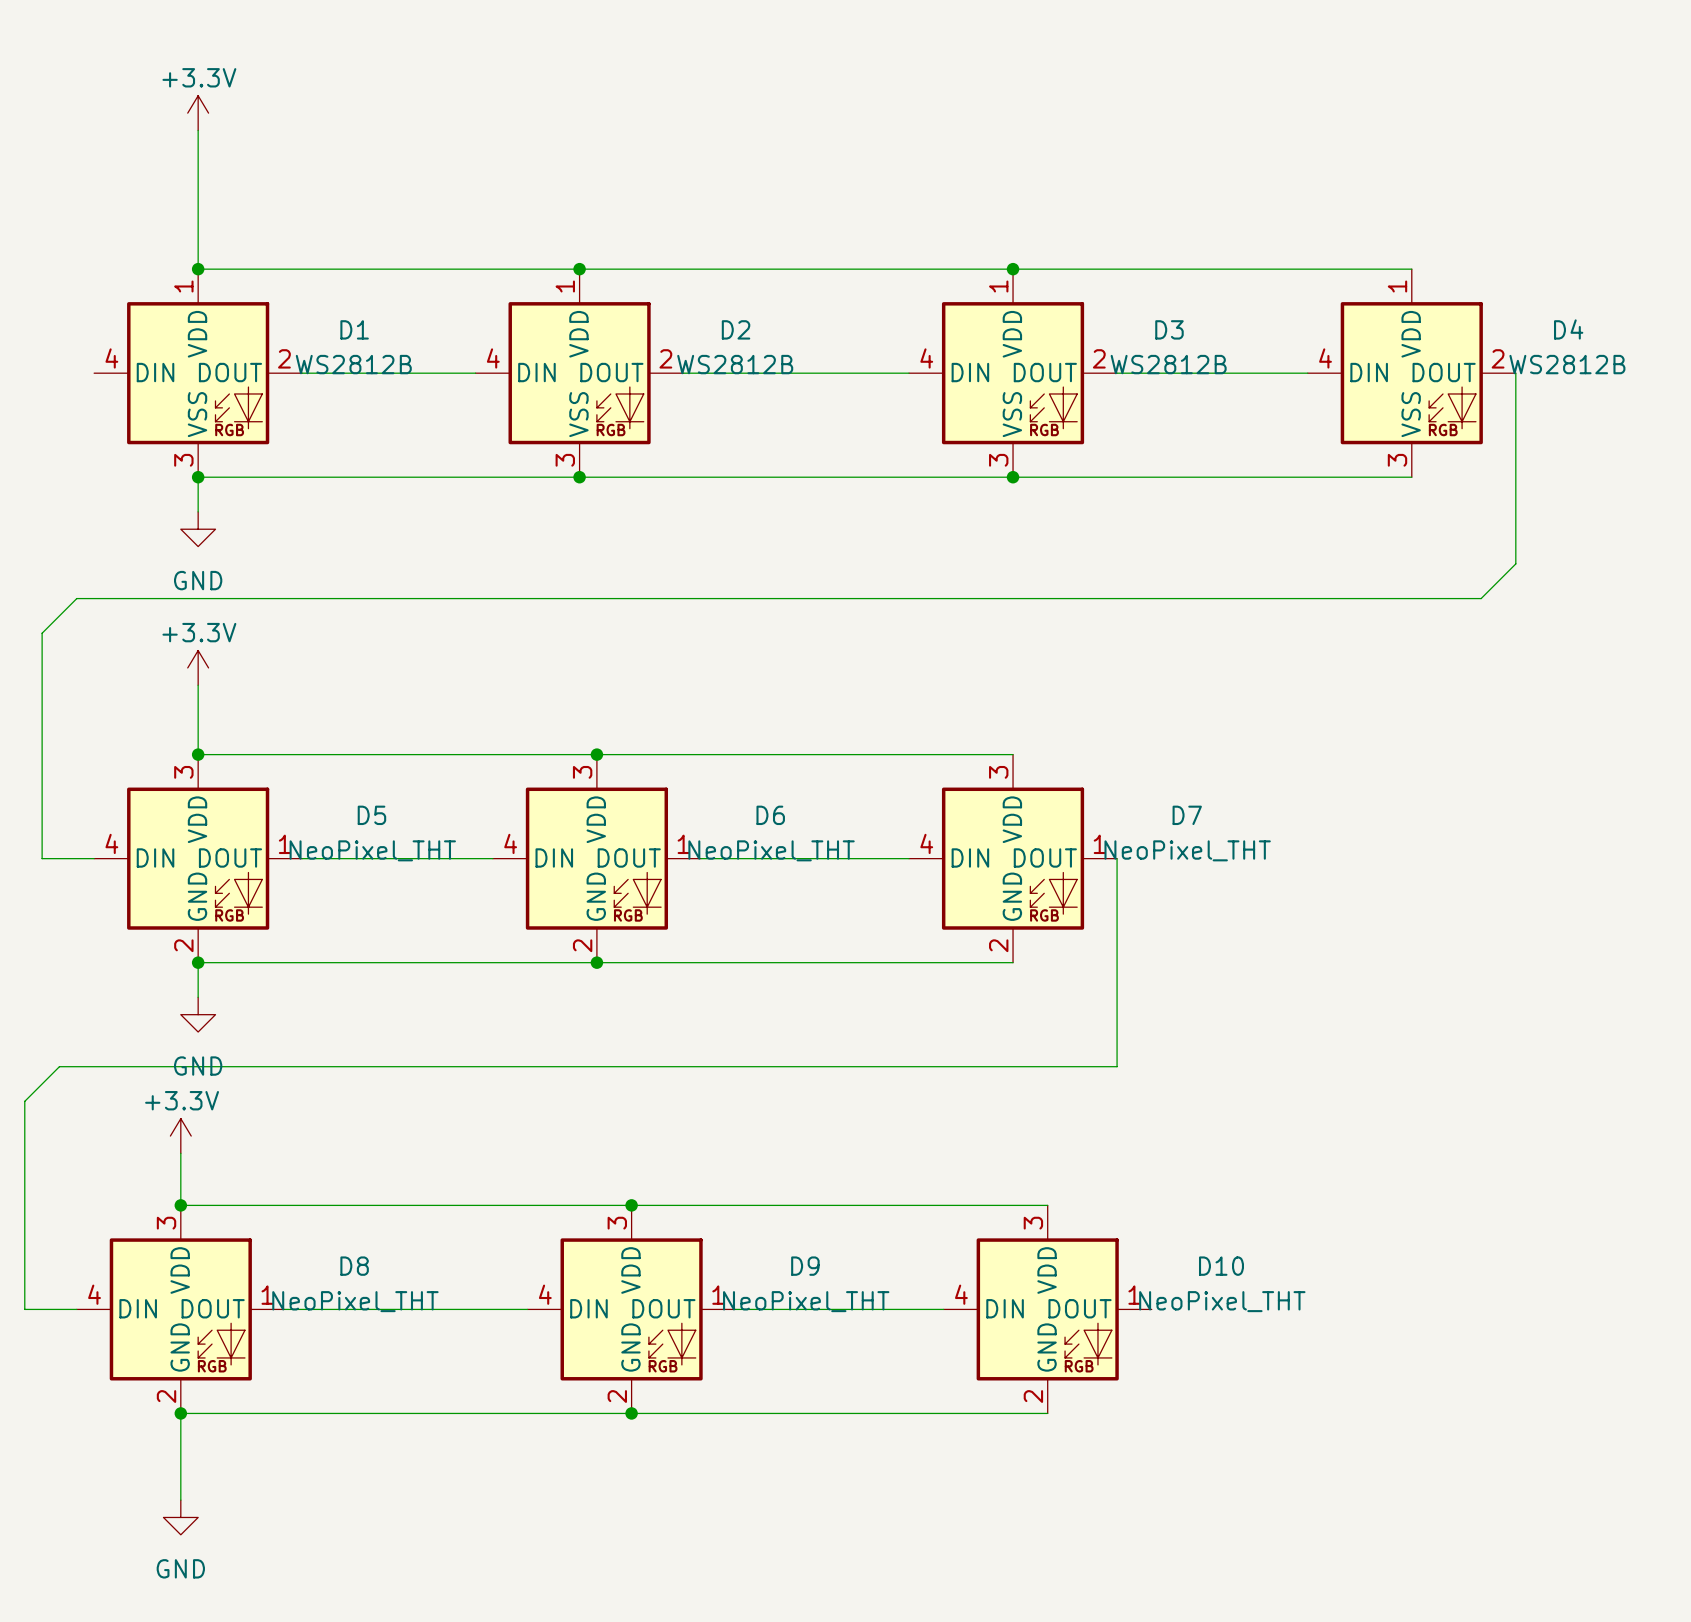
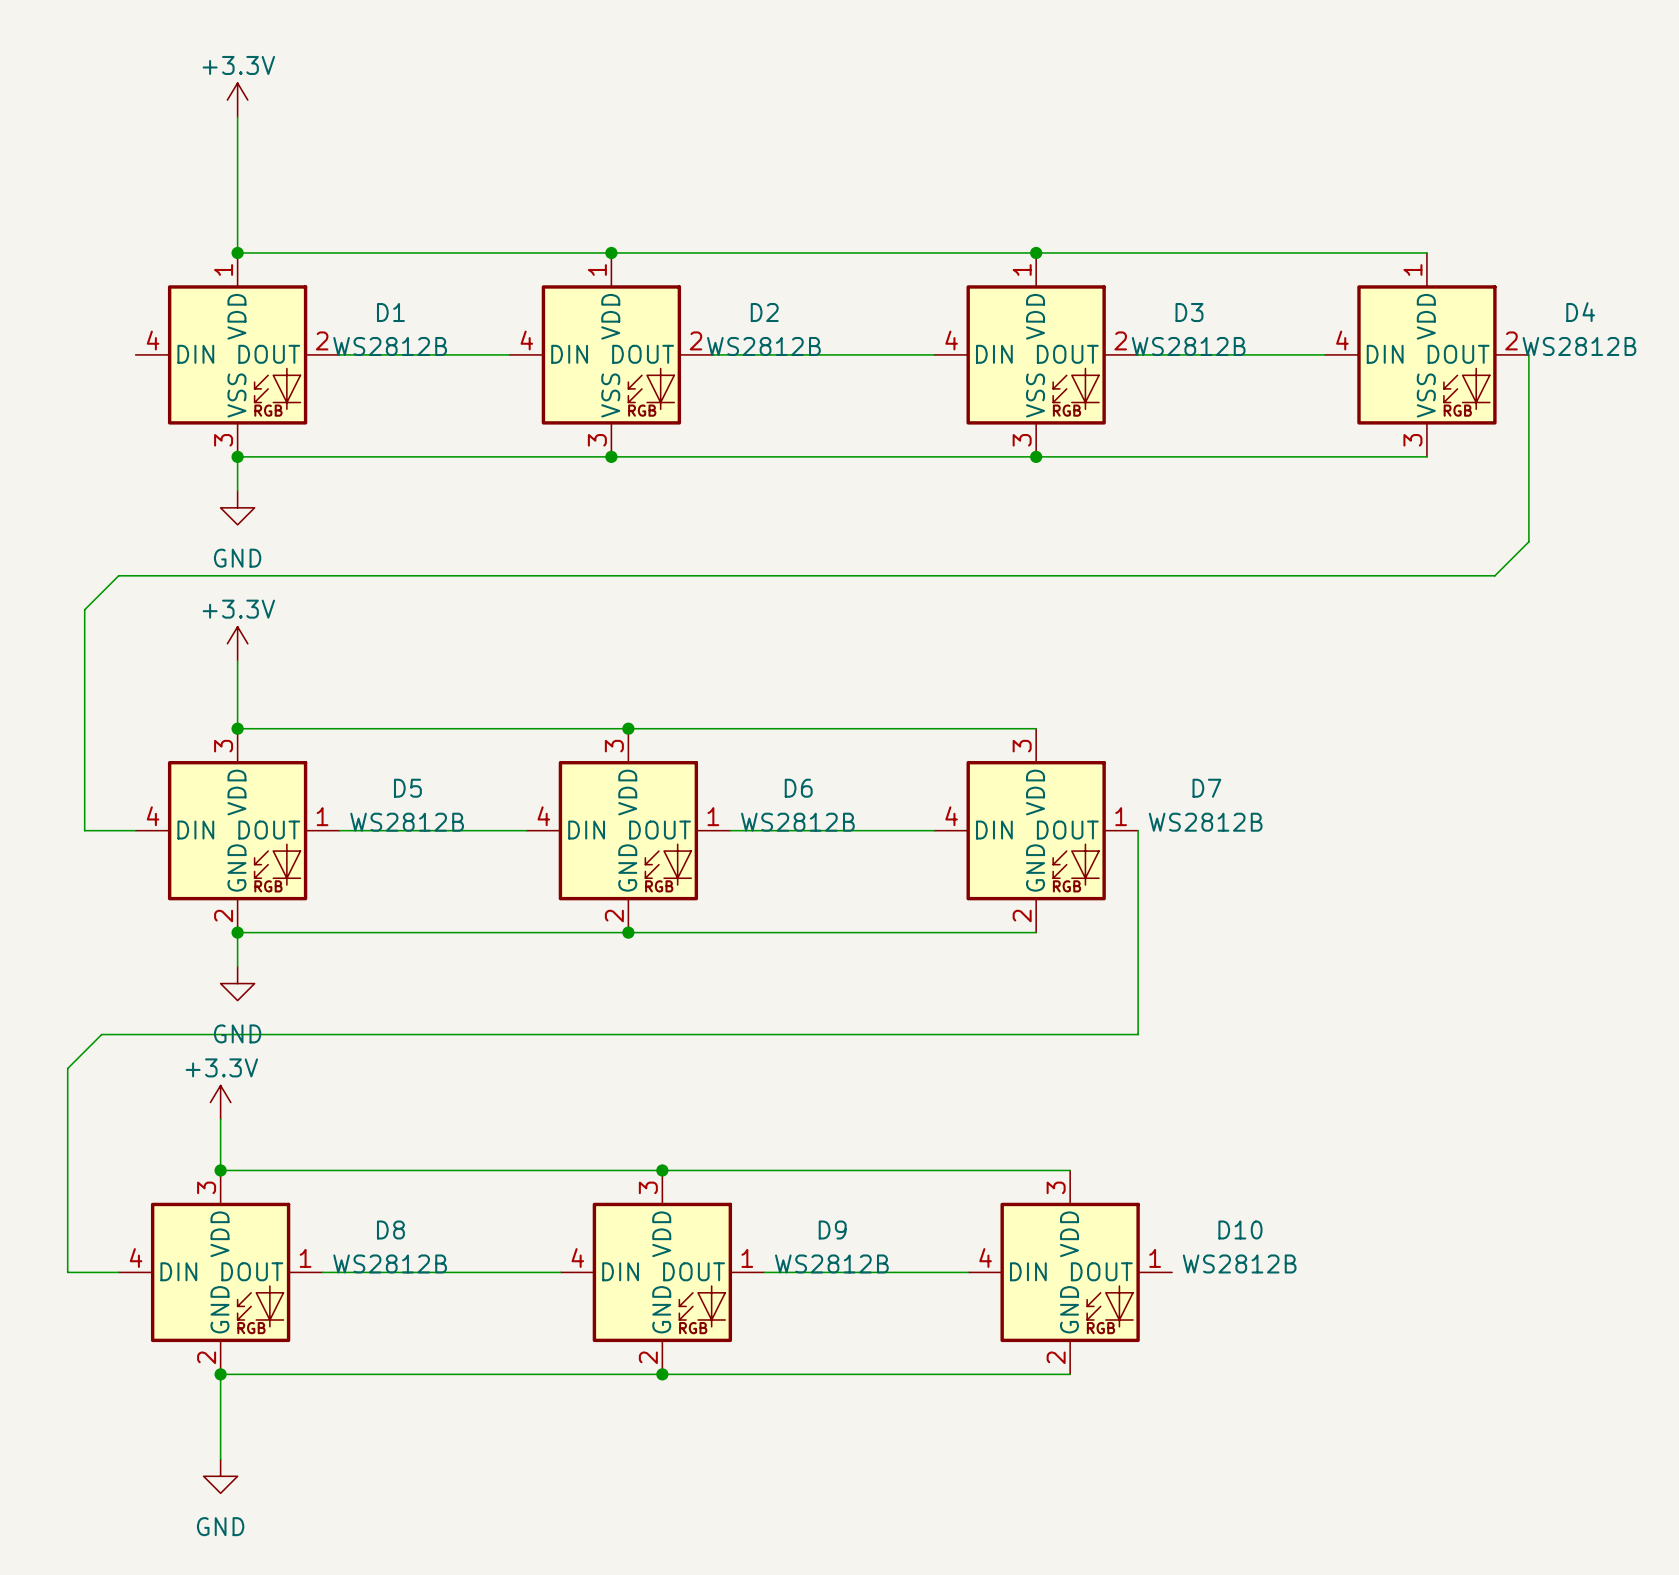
D5 value: NeoPixel_THT (372, 850) -> WS2812B (407, 822)
D6 value: NeoPixel_THT (771, 850) -> WS2812B (797, 822)
D7 value: NeoPixel_THT (1187, 850) -> WS2812B (1205, 822)
D8 value: NeoPixel_THT (355, 1301) -> WS2812B (390, 1263)
D9 value: NeoPixel_THT (806, 1301) -> WS2812B (831, 1263)
D10 value: NeoPixel_THT (1222, 1301) -> WS2812B (1239, 1263)

